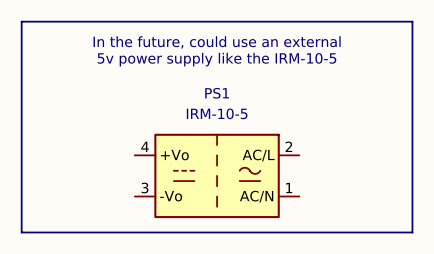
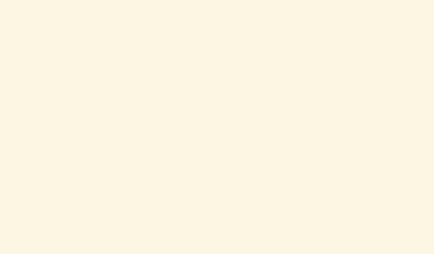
line: (21, 21) (412, 21) (412, 232) (21, 232) (21, 21) -> none
text: In the future, could use an external (217, 42) -> none
text: 5v power supply like the IRM-10-5 (216, 59) -> none
PS1: IRM-10-5 (217, 175) -> none

